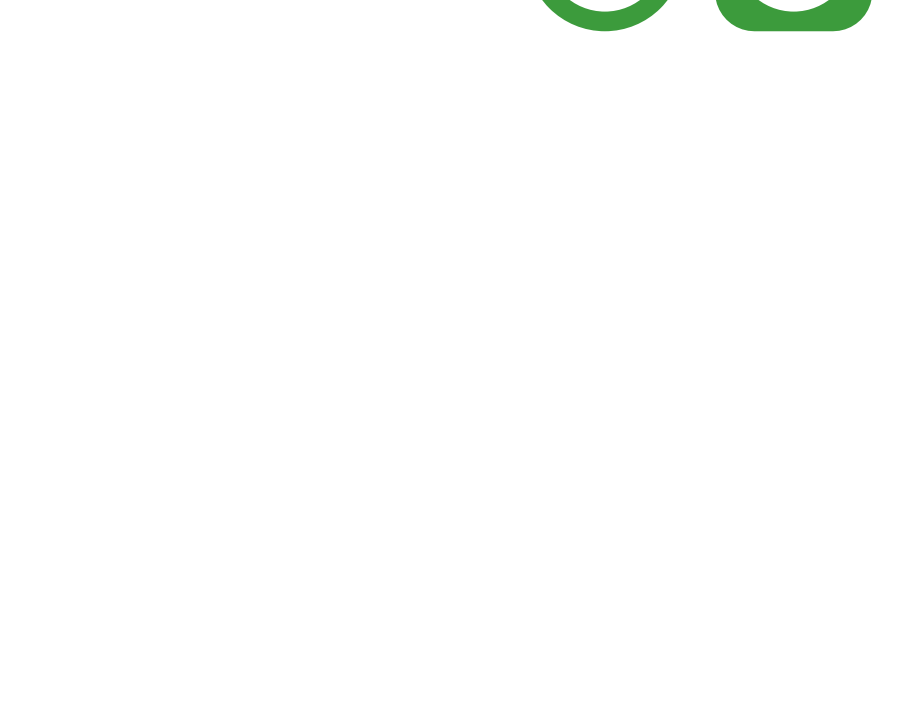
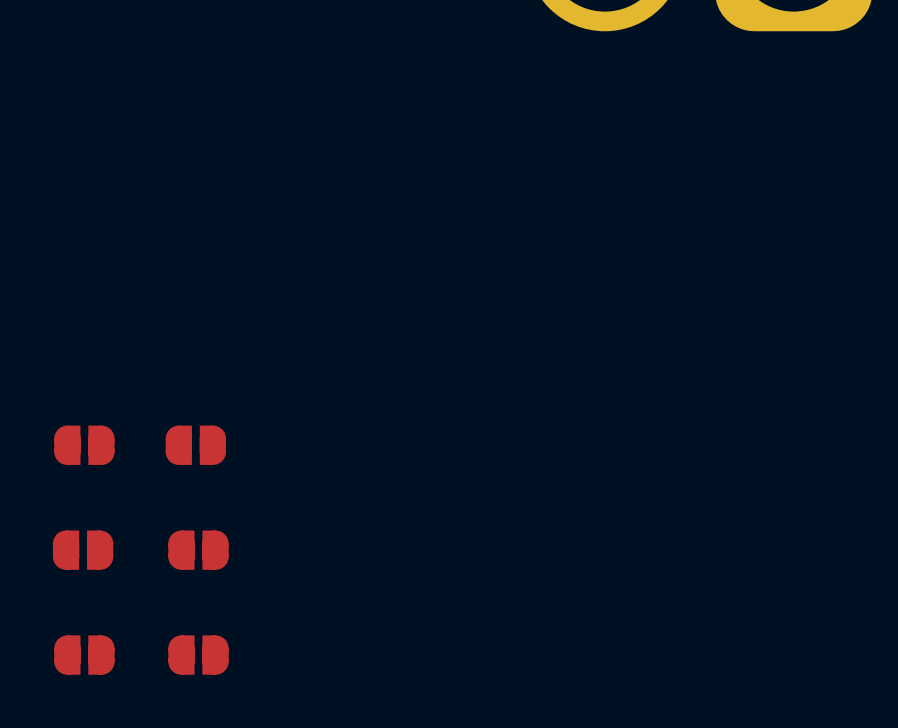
part: none -> (84, 445)
part: none -> (195, 445)
part: none -> (83, 550)
part: none -> (198, 550)
part: none -> (84, 655)
part: none -> (198, 655)

